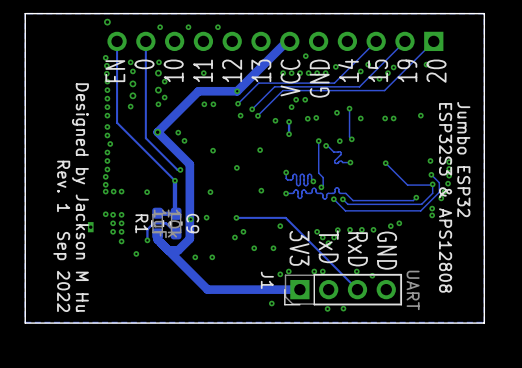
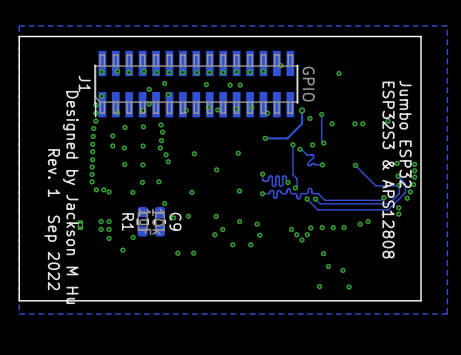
via: (107, 22) -> none
board edge: (25, 24) (25, 13) (484, 13) (484, 323) (25, 323) (25, 308) -> (19, 36) (420, 36) (420, 300) (19, 300)
via: (160, 27) -> none
via: (188, 27) -> none
via: (217, 27) -> none
track: (117, 41) (117, 122) (174, 180) (176, 213) (157, 213) -> none
track: (145, 41) (145, 138) (177, 169) (180, 169) -> none
part: (275, 41) -> none
track: (289, 41) (287, 41) (237, 91) (198, 91) (157, 132) (189, 164) (189, 238) (178, 250) (168, 250) -> none
track: (376, 41) (334, 83) (258, 83) (238, 103) -> none
track: (404, 41) (359, 86) (274, 86) (252, 109) -> none
track: (433, 41) (384, 90) (282, 90) (257, 115) -> none
via: (105, 57) -> none
via: none -> (101, 71)
via: none -> (236, 71)
via: none -> (263, 71)
via: none -> (129, 72)
via: none -> (156, 72)
via: none -> (169, 72)
via: none -> (182, 72)
via: none -> (196, 72)
via: none -> (209, 72)
via: none -> (223, 72)
via: none -> (249, 72)
text: 0 (144, 64) -> none
via: (426, 64) -> none
via: (106, 65) -> none
via: (335, 66) -> none
via: (393, 67) -> none
text: 10 (173, 70) -> none
text: 11 (202, 70) -> none
text: 12 (232, 70) -> none
text: 13 (261, 70) -> none
text: 14 (348, 70) -> none
text: 15 (378, 70) -> none
text: 19 (407, 70) -> none
text: EN (115, 71) -> none
via: (132, 71) -> none
via: (360, 71) -> none
text: 20 (436, 71) -> none
via: (106, 73) -> none
via: (158, 73) -> none
via: (203, 73) -> none
via: (283, 73) -> none
via: (291, 73) -> none
via: (300, 73) -> none
via: (308, 73) -> none
via: (317, 73) -> none
via: (325, 73) -> none
via: (387, 73) -> none
via: none -> (164, 83)
via: none -> (206, 84)
via: none -> (230, 85)
via: none -> (240, 85)
text: VCC (290, 77) -> none
text: GND (319, 78) -> none
via: (379, 78) -> none
via: (107, 81) -> none
via: (132, 83) -> none
via: none -> (168, 94)
via: none -> (101, 96)
via: (107, 90) -> none
via: (158, 90) -> none
via: (237, 91) -> none
via: (132, 95) -> none
via: (296, 99) -> none
via: (305, 99) -> none
via: none -> (208, 107)
via: none -> (251, 107)
via: none -> (235, 108)
via: (213, 104) -> none
via: none -> (302, 110)
via: (252, 109) -> none
via: (240, 115) -> none
via: (257, 115) -> none
via: (316, 117) -> none
via: (307, 118) -> none
via: none -> (161, 124)
via: (275, 120) -> none
via: none -> (143, 126)
track: (289, 121) (289, 134) -> (302, 110) (302, 123) (287, 138) (265, 138)
via: (289, 121) -> none
via: none -> (124, 127)
via: none -> (93, 128)
via: (107, 126) -> none
via: none -> (162, 132)
via: none -> (112, 135)
via: none -> (93, 136)
via: (157, 132) -> none
via: (178, 132) -> none
via: (107, 135) -> none
via: none -> (161, 140)
via: none -> (92, 144)
via: (184, 140) -> none
via: none -> (112, 145)
via: none -> (143, 146)
via: (110, 143) -> none
via: none -> (124, 148)
via: none -> (160, 148)
via: none -> (92, 151)
via: none -> (166, 154)
via: (107, 152) -> none
via: none -> (92, 159)
via: none -> (168, 161)
text position: Jumbo ESP32 (463, 159) -> Jumbo ESP32 (405, 134)
via: (107, 160) -> none
via: none -> (124, 164)
via: none -> (142, 164)
via: none -> (92, 167)
via: (107, 169) -> none
via: (180, 169) -> none
via: none -> (92, 174)
via: (105, 176) -> none
via: none -> (92, 181)
via: none -> (142, 182)
via: (105, 184) -> none
via: none -> (96, 189)
via: none -> (103, 189)
via: (105, 191) -> none
via: (113, 191) -> none
text position: ESP32S3 & APS12808 (445, 197) -> ESP32S3 & APS12808 (388, 170)
via: none -> (164, 203)
via: (105, 214) -> none
via: (113, 214) -> none
via: (121, 214) -> none
track: (236, 217) (285, 217) (357, 289) -> none
via: none -> (239, 221)
track: (157, 233) (157, 239) (207, 289) (299, 289) -> none
track: (176, 233) (166, 223) (153, 223) (147, 229) (147, 240) -> none
text position: Rev. 1 Sep 2022 (61, 236) -> Rev. 1 Sep 2022 (52, 219)
via: none -> (259, 235)
text: TxD (328, 246) -> none
text: 3V3 (299, 248) -> none
text: RxD (357, 249) -> none
text: GND (387, 250) -> none
via: none -> (323, 253)
via: (288, 271) -> none
via: (314, 271) -> none
via: (322, 271) -> none
J1 footprint: [284, 273, 403, 306] -> [94, 50, 299, 118]
via: (280, 274) -> none
J1 name position: J1 (267, 280) -> J1 (84, 83)
J1 value: UART (413, 290) -> GPIO (308, 84)
via: none -> (319, 286)
via: none -> (349, 287)
via: (271, 303) -> none
via: (327, 308) -> none
via: (343, 308) -> none

